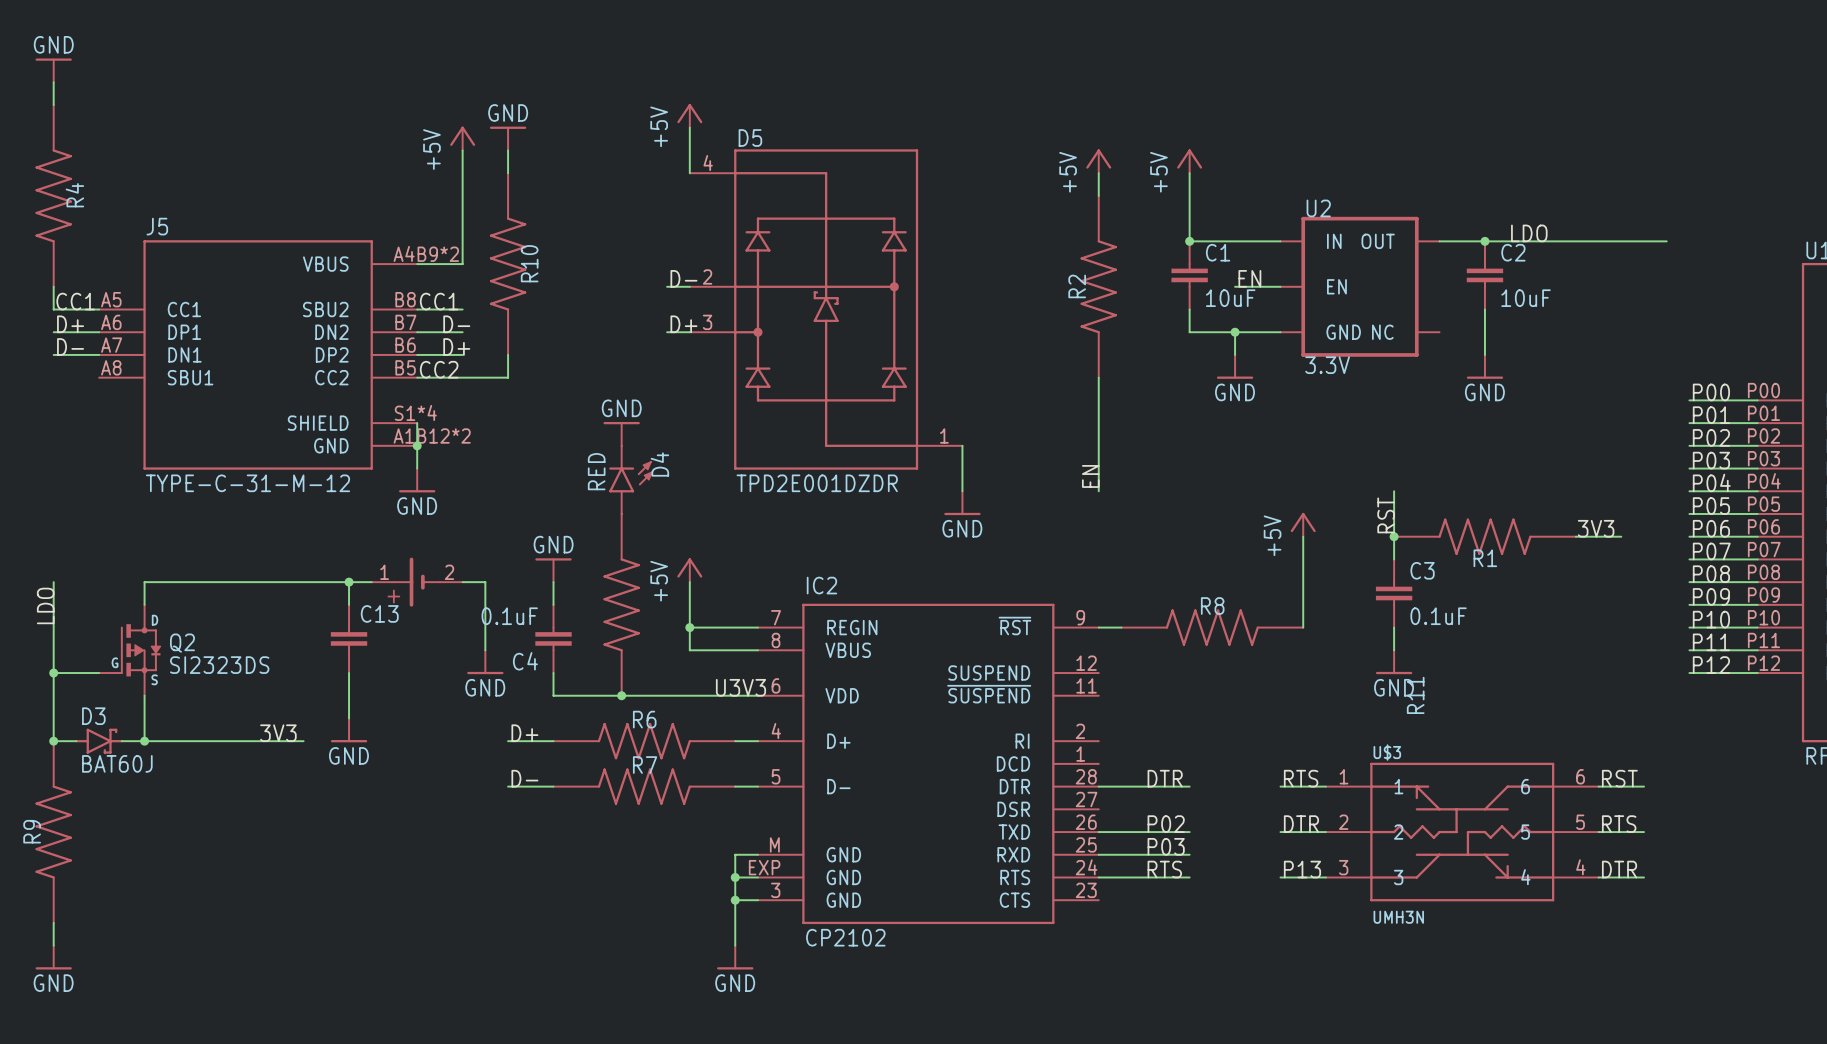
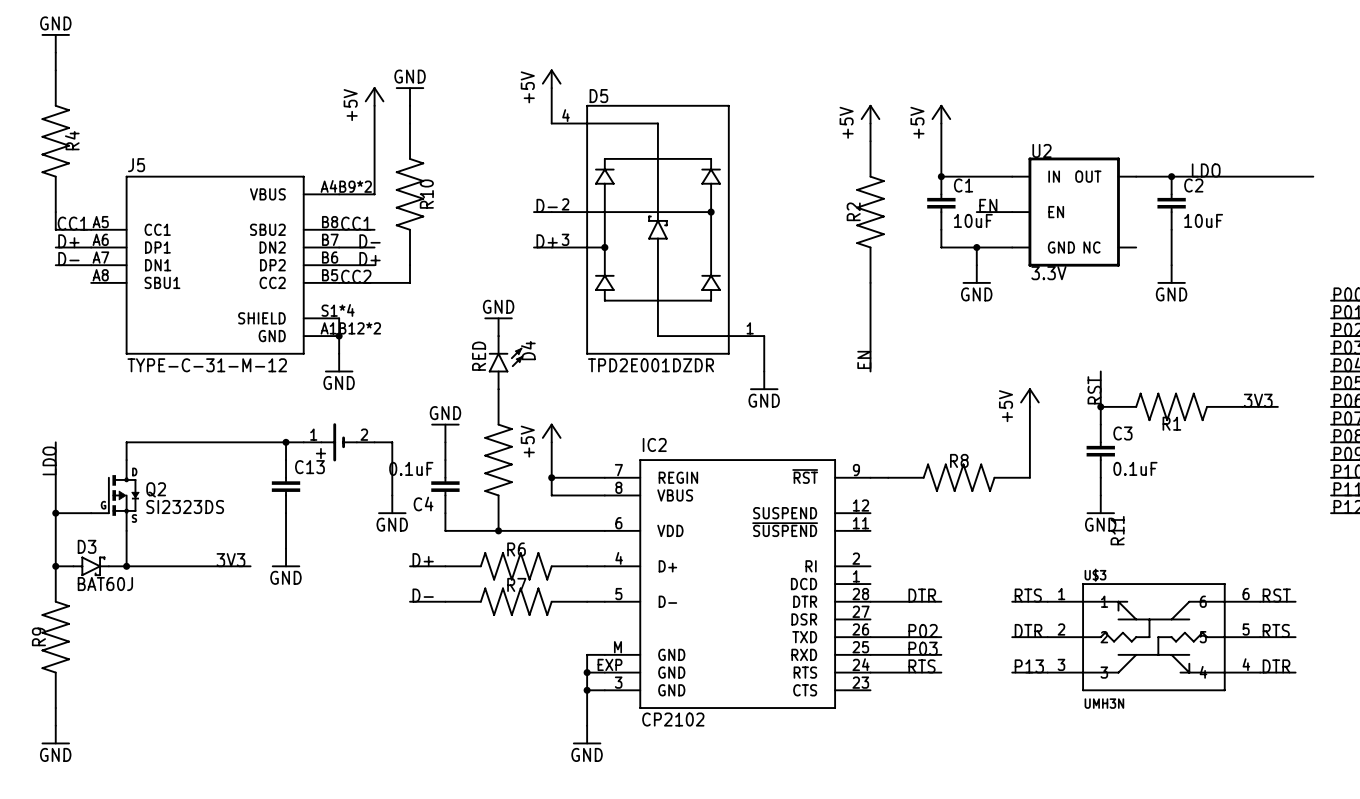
label: U3V3 (740, 687) -> none

